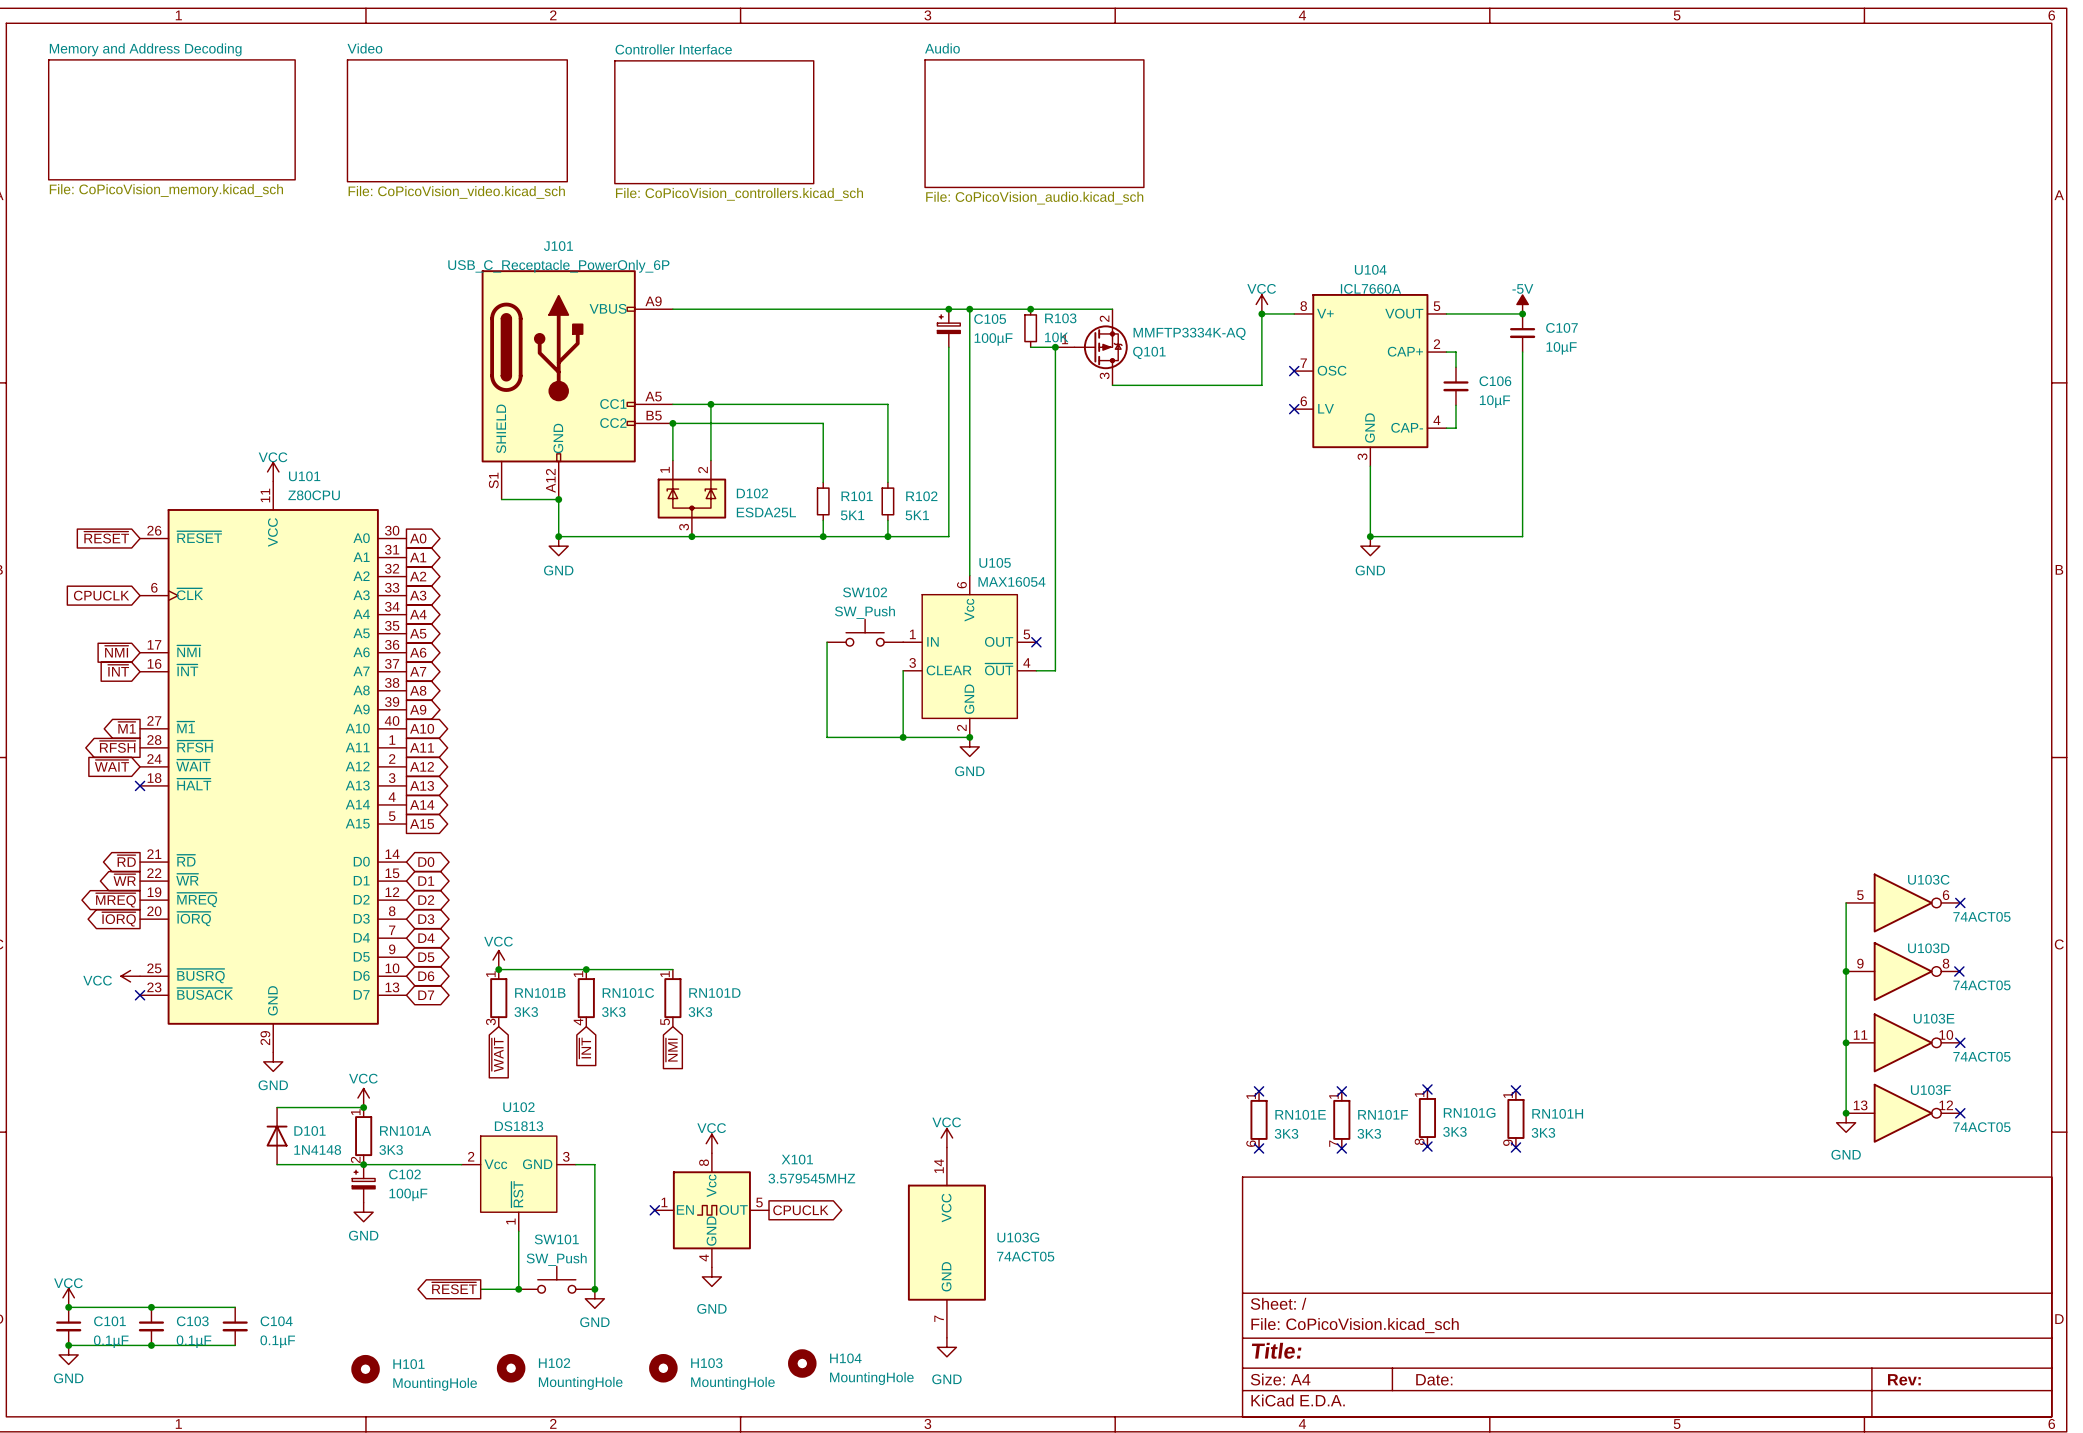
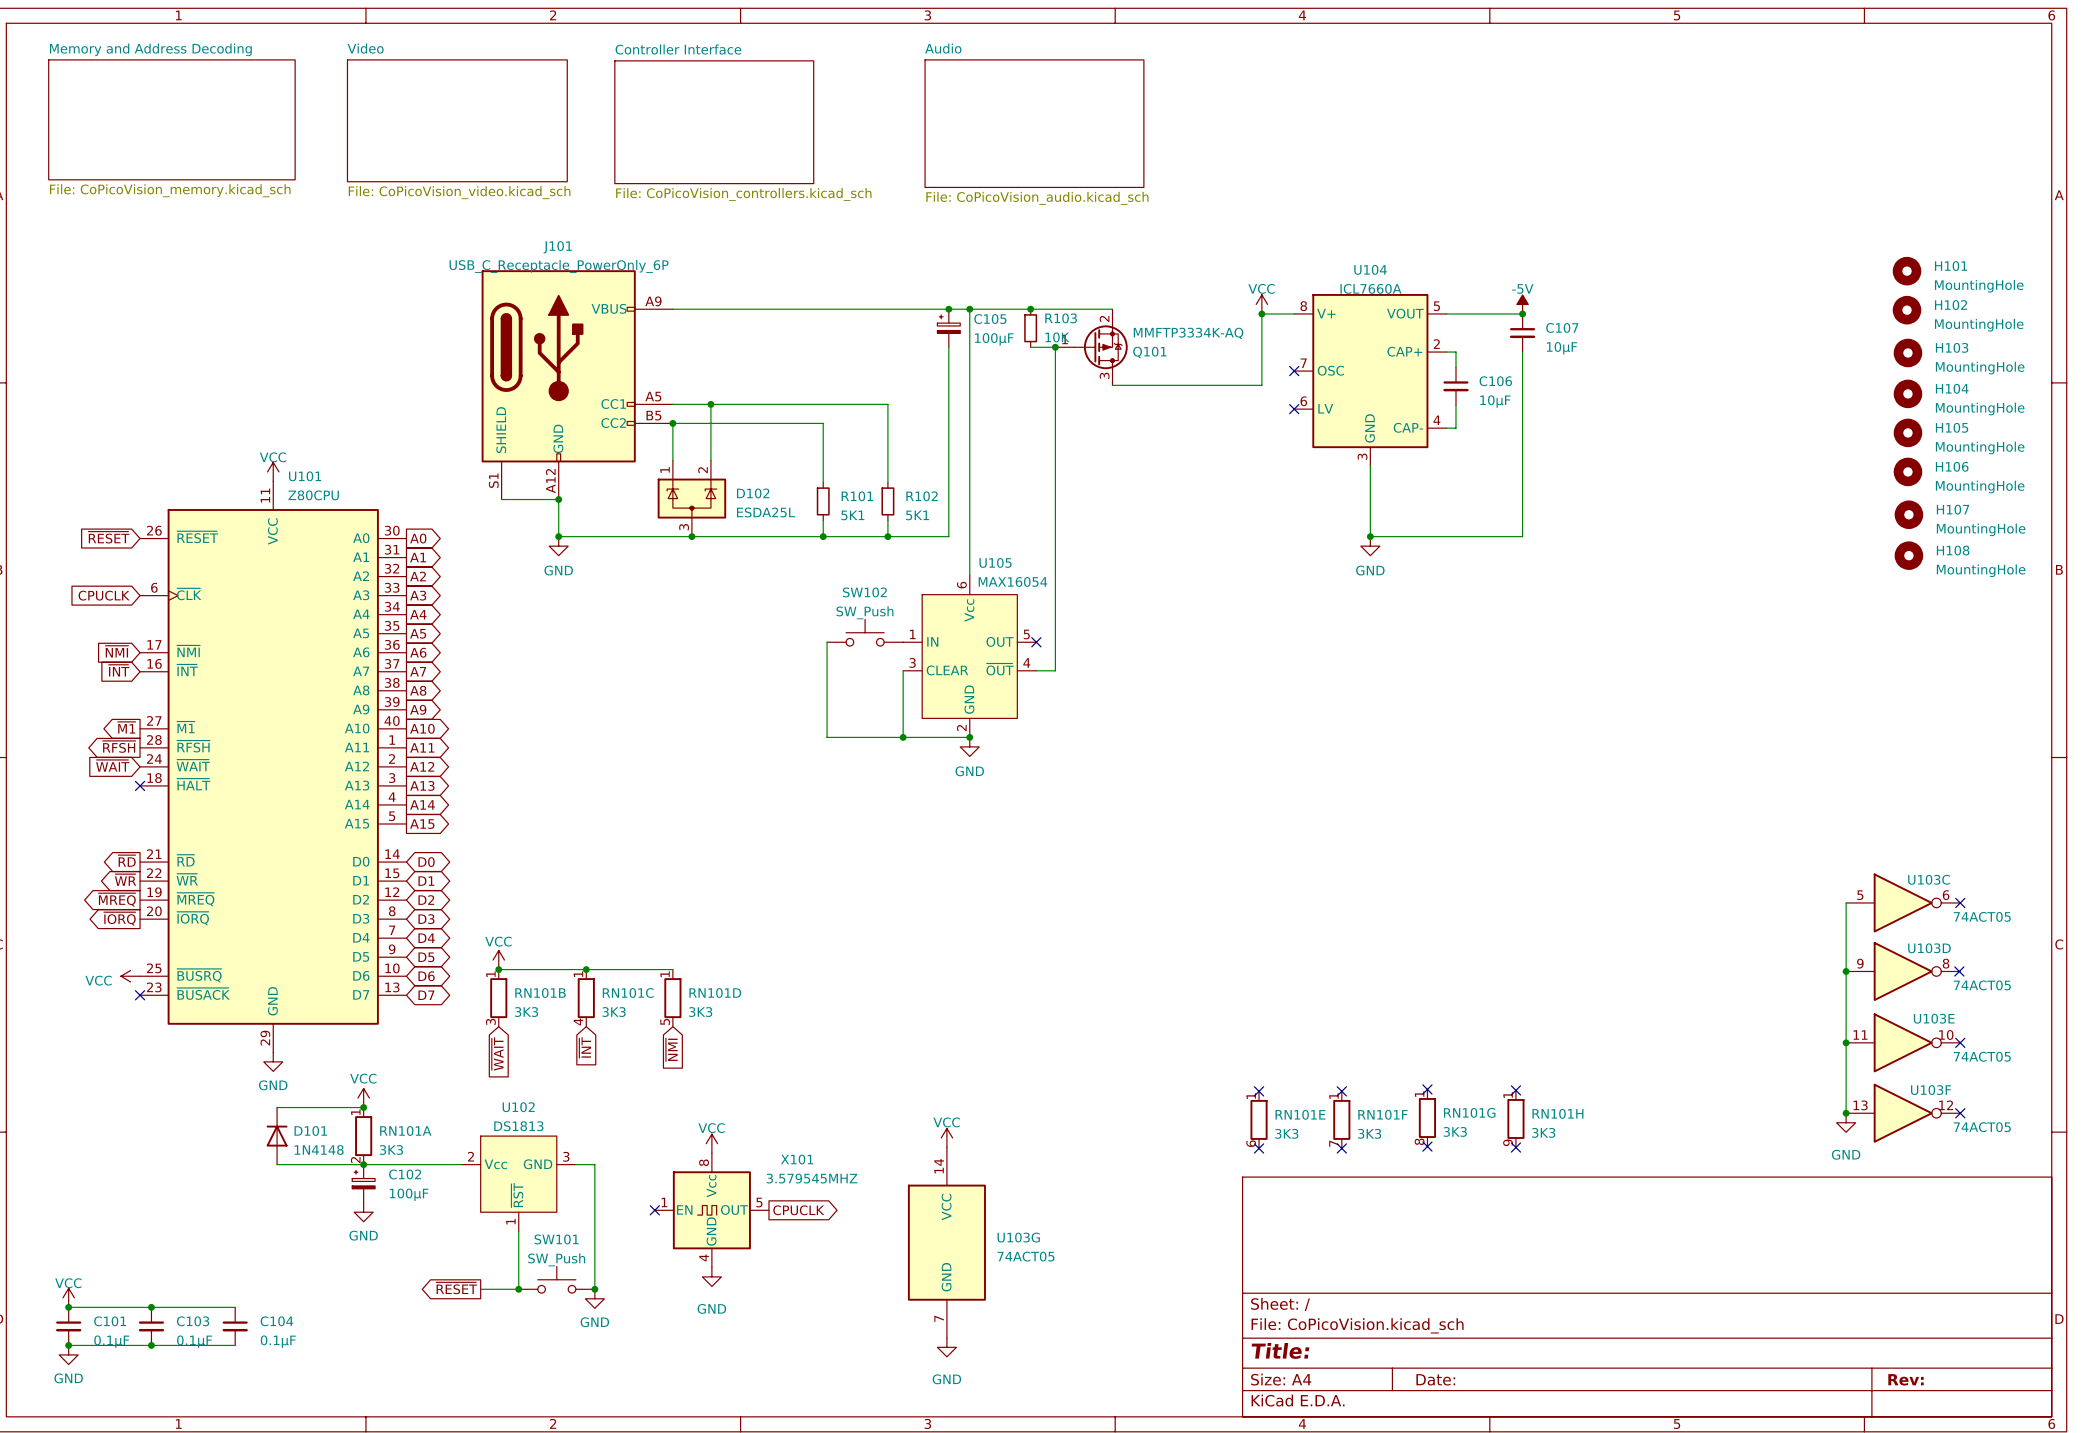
H105: none -> MountingHole (1907, 432)
H106: none -> MountingHole (1907, 471)
H107: none -> MountingHole (1908, 514)
H108: none -> MountingHole (1908, 555)
H104 position: (802, 1363) -> (1907, 393)
H102 position: (511, 1368) -> (1907, 310)
H103 position: (663, 1368) -> (1907, 352)
H101 position: (365, 1369) -> (1907, 271)

